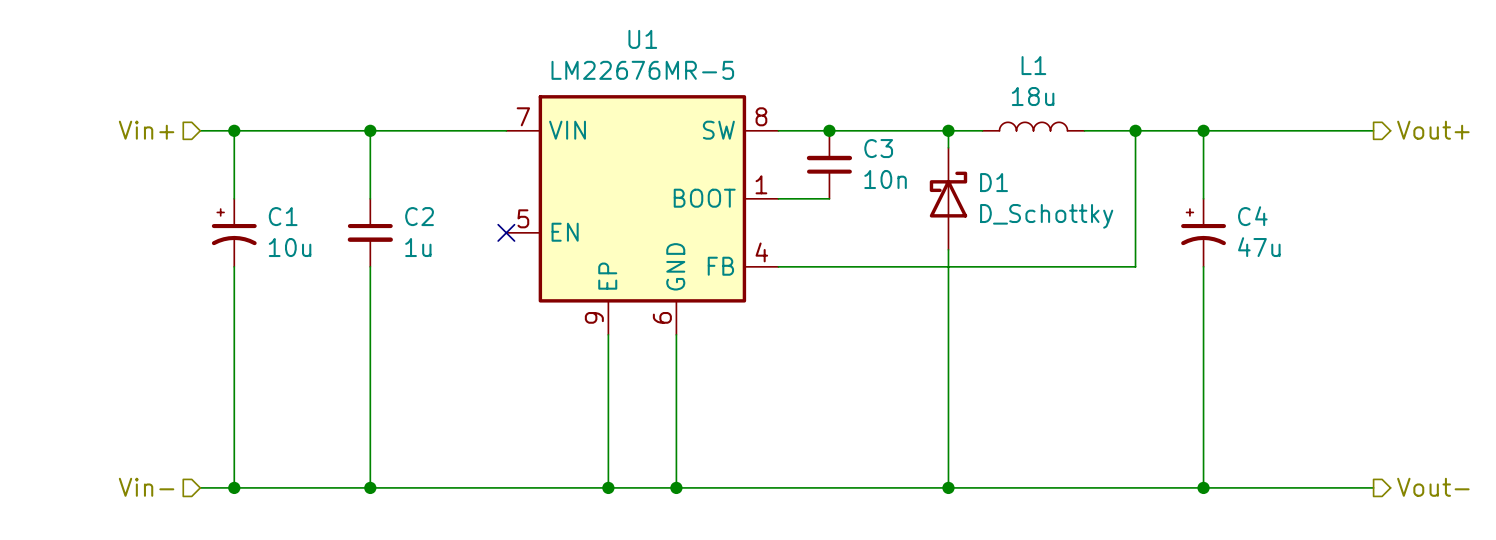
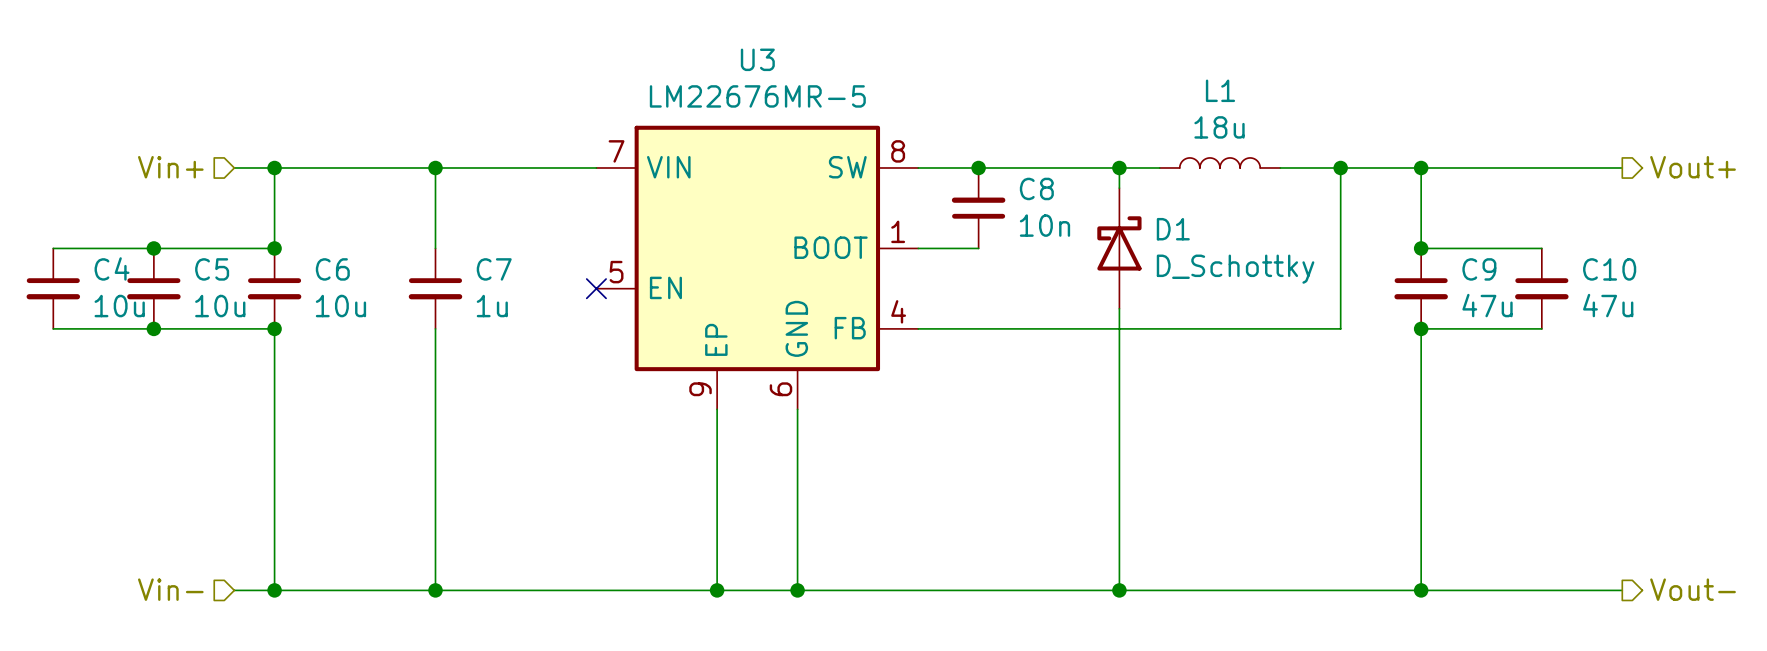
U1 name: U1 (642, 39) -> U3 (757, 59)
C3 name: C3 (878, 148) -> C8 (1036, 188)
wire: none -> (53, 248) (274, 248)
junction: none -> (153, 248)
junction: none -> (274, 248)
C4 symbol: [1181, 198, 1226, 267] -> [26, 248, 81, 329]
wire: none -> (1421, 248) (1541, 248)
junction: none -> (1421, 248)
C2 name: C2 (419, 216) -> C7 (494, 269)
C5: none -> 10u (153, 288)
C1: 10u (234, 232) -> none
C6: none -> 10u (274, 288)
C9: none -> 47u (1421, 288)
C10: none -> 47u (1541, 288)
C4 value: 47u (1259, 247) -> 10u (119, 306)
wire: none -> (53, 328) (274, 328)
junction: none -> (153, 328)
junction: none -> (274, 328)
wire: none -> (1421, 328) (1541, 328)
junction: none -> (1421, 328)

